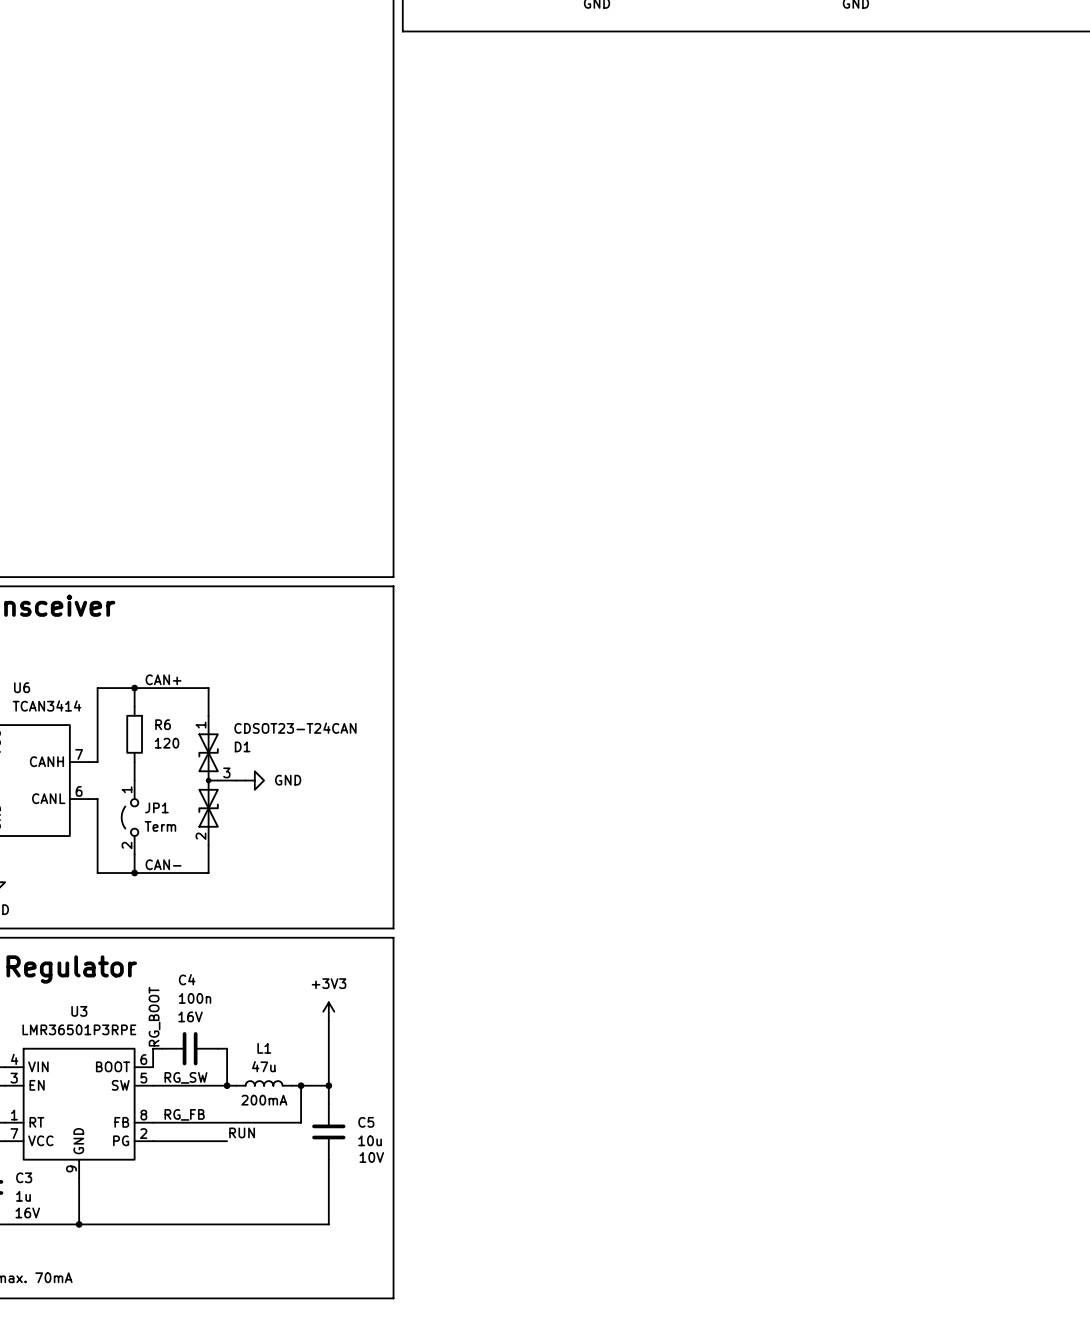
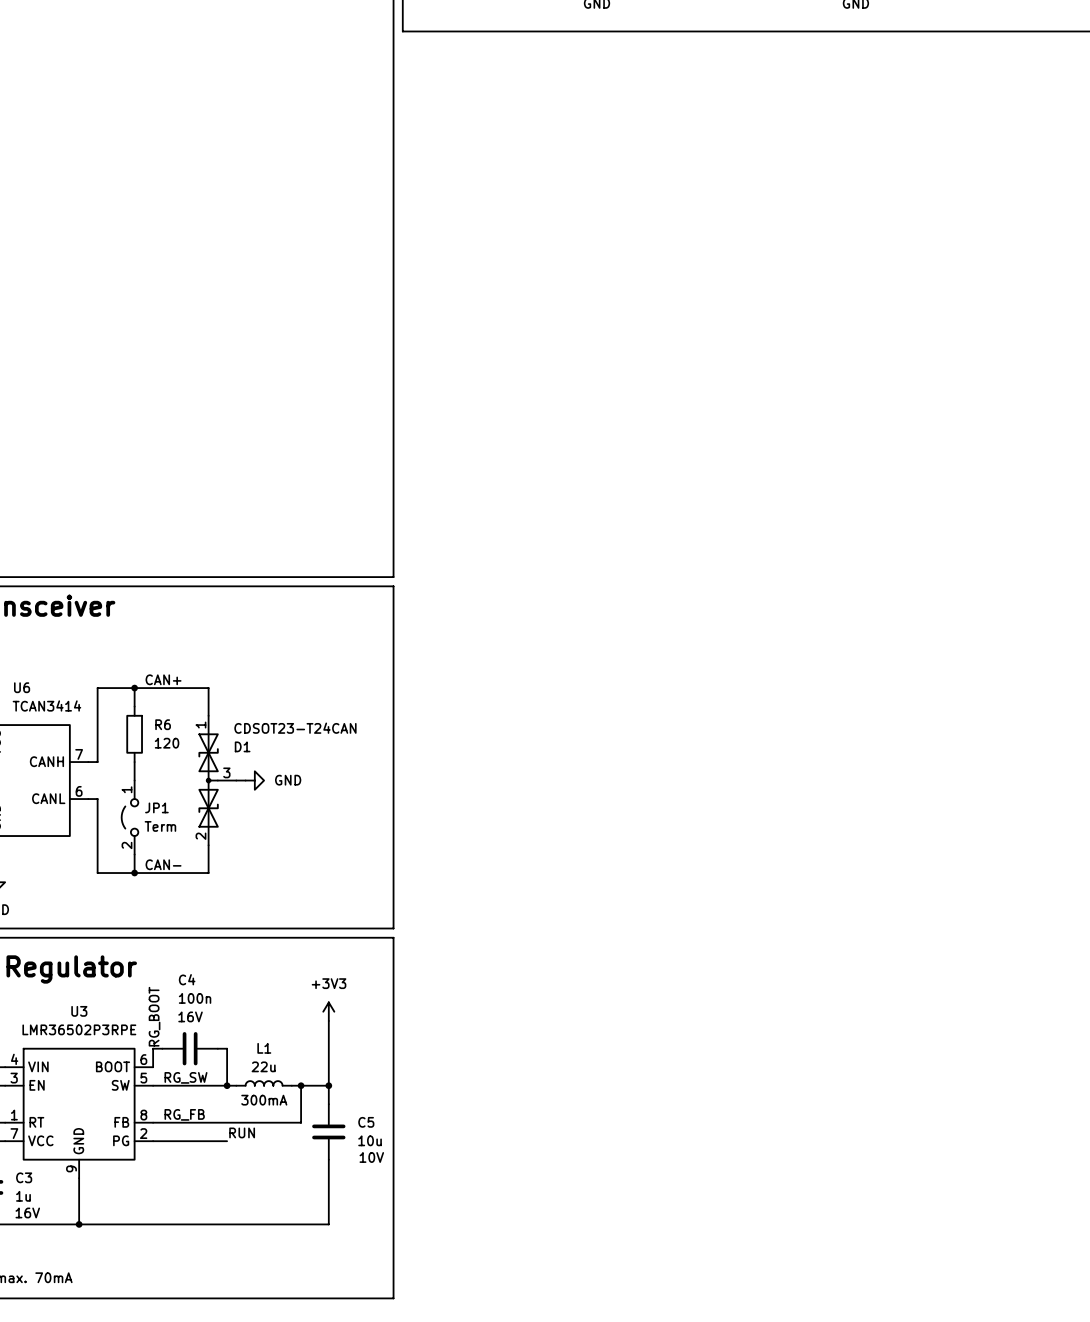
U3 value: LMR36501P3RPE (79, 1029) -> LMR36502P3RPE (79, 1029)
L1 value: 47u (263, 1066) -> 22u (263, 1066)
L1 text: 200mA (264, 1100) -> 300mA (264, 1100)

